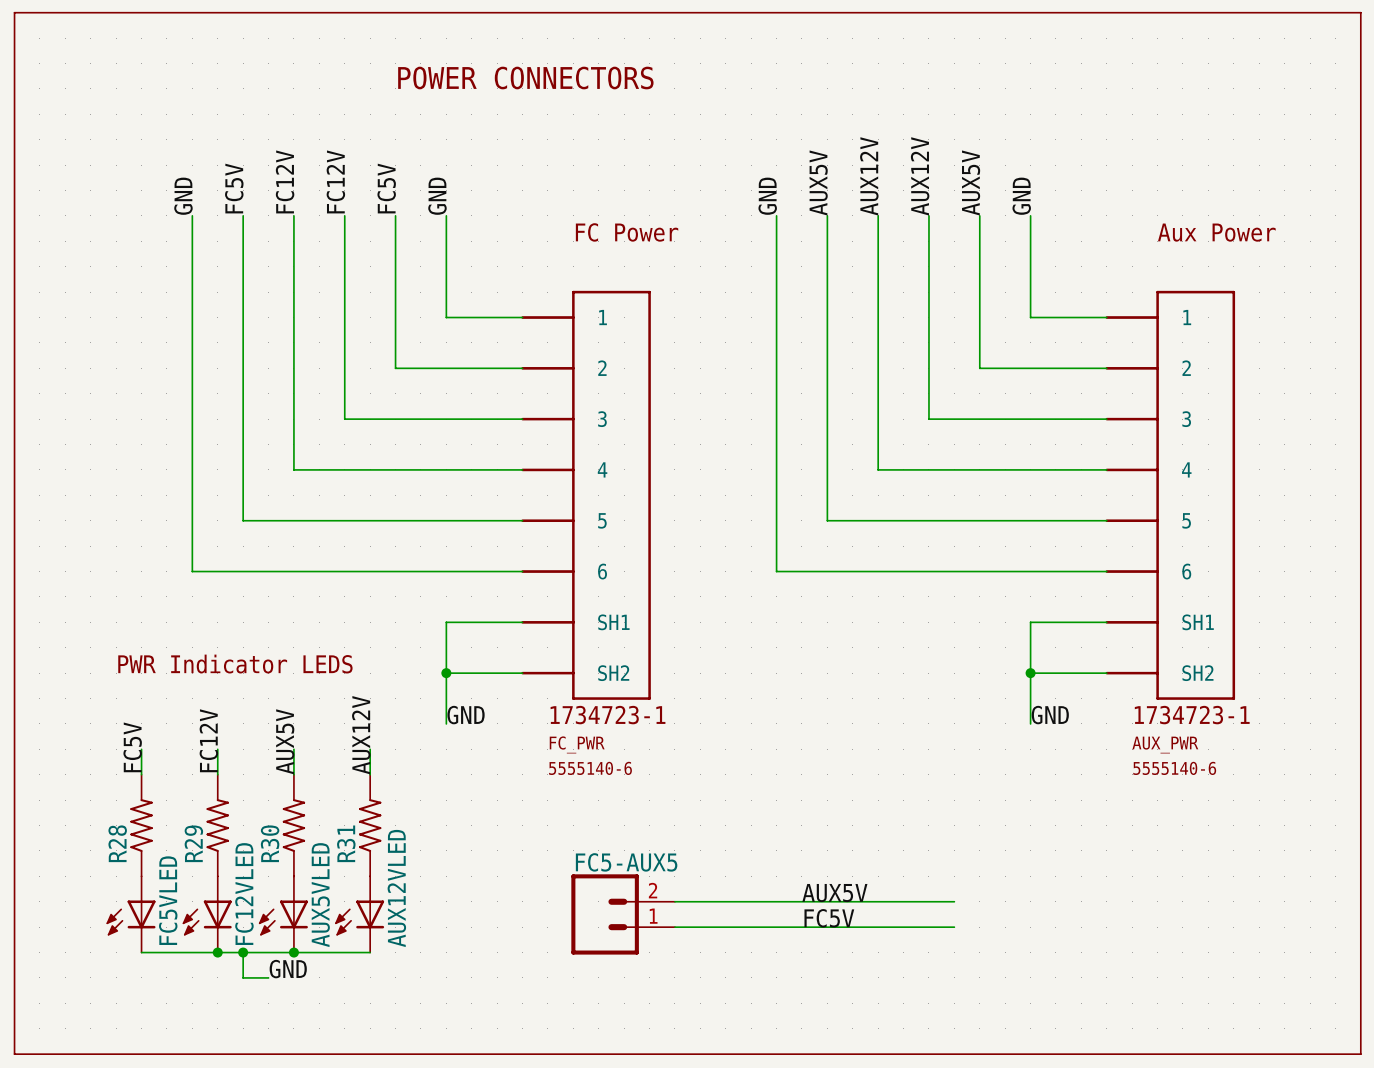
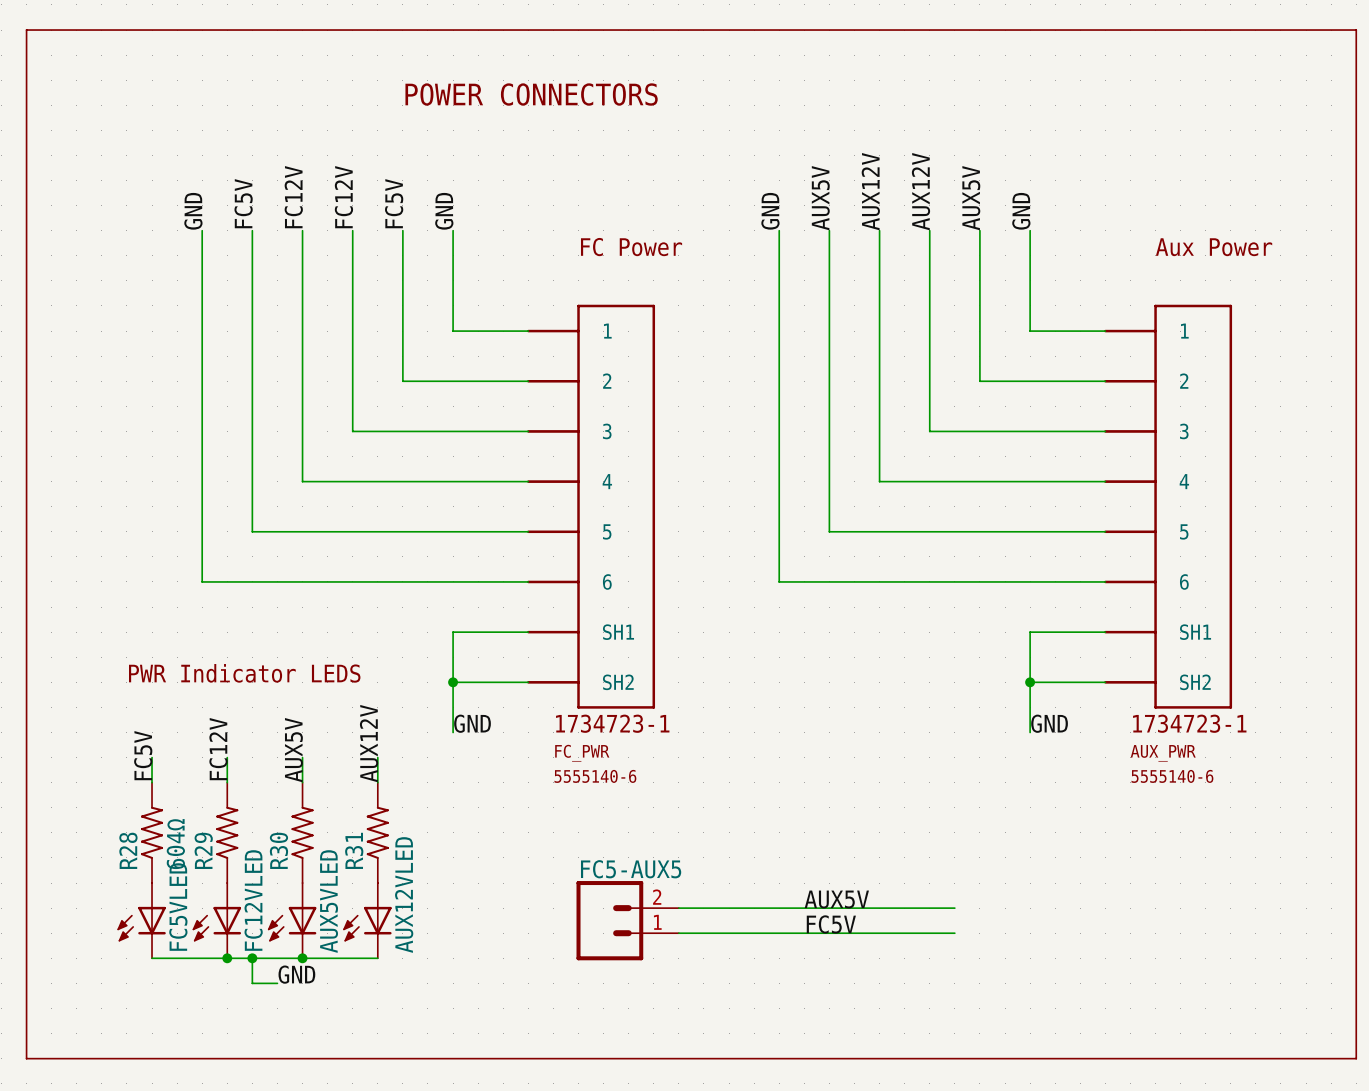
R28 value: none -> 604Ω (175, 844)

